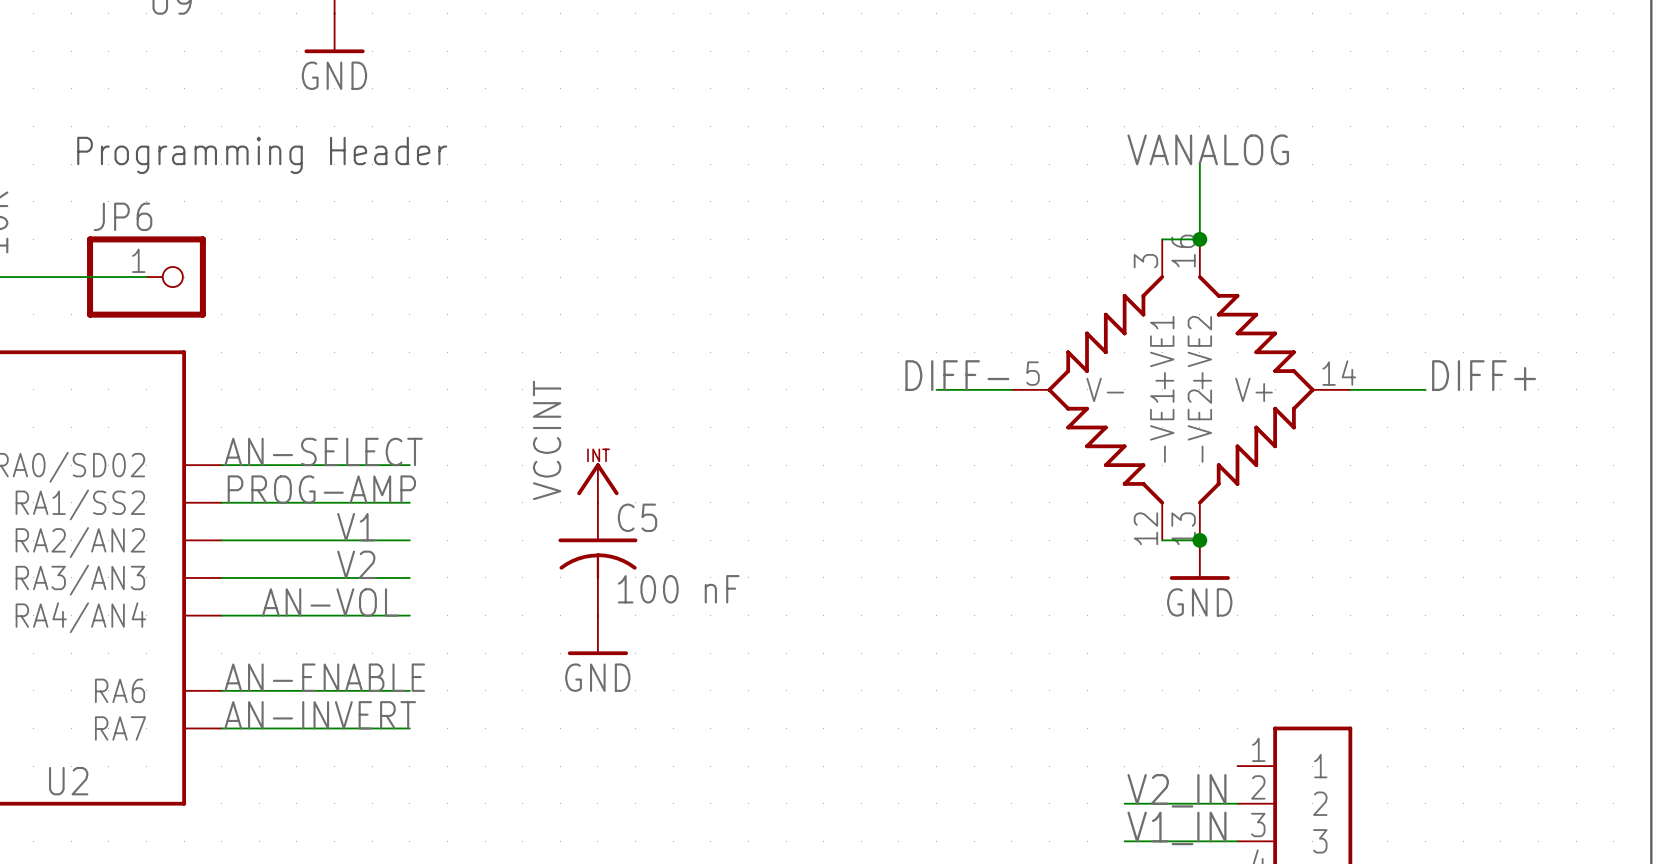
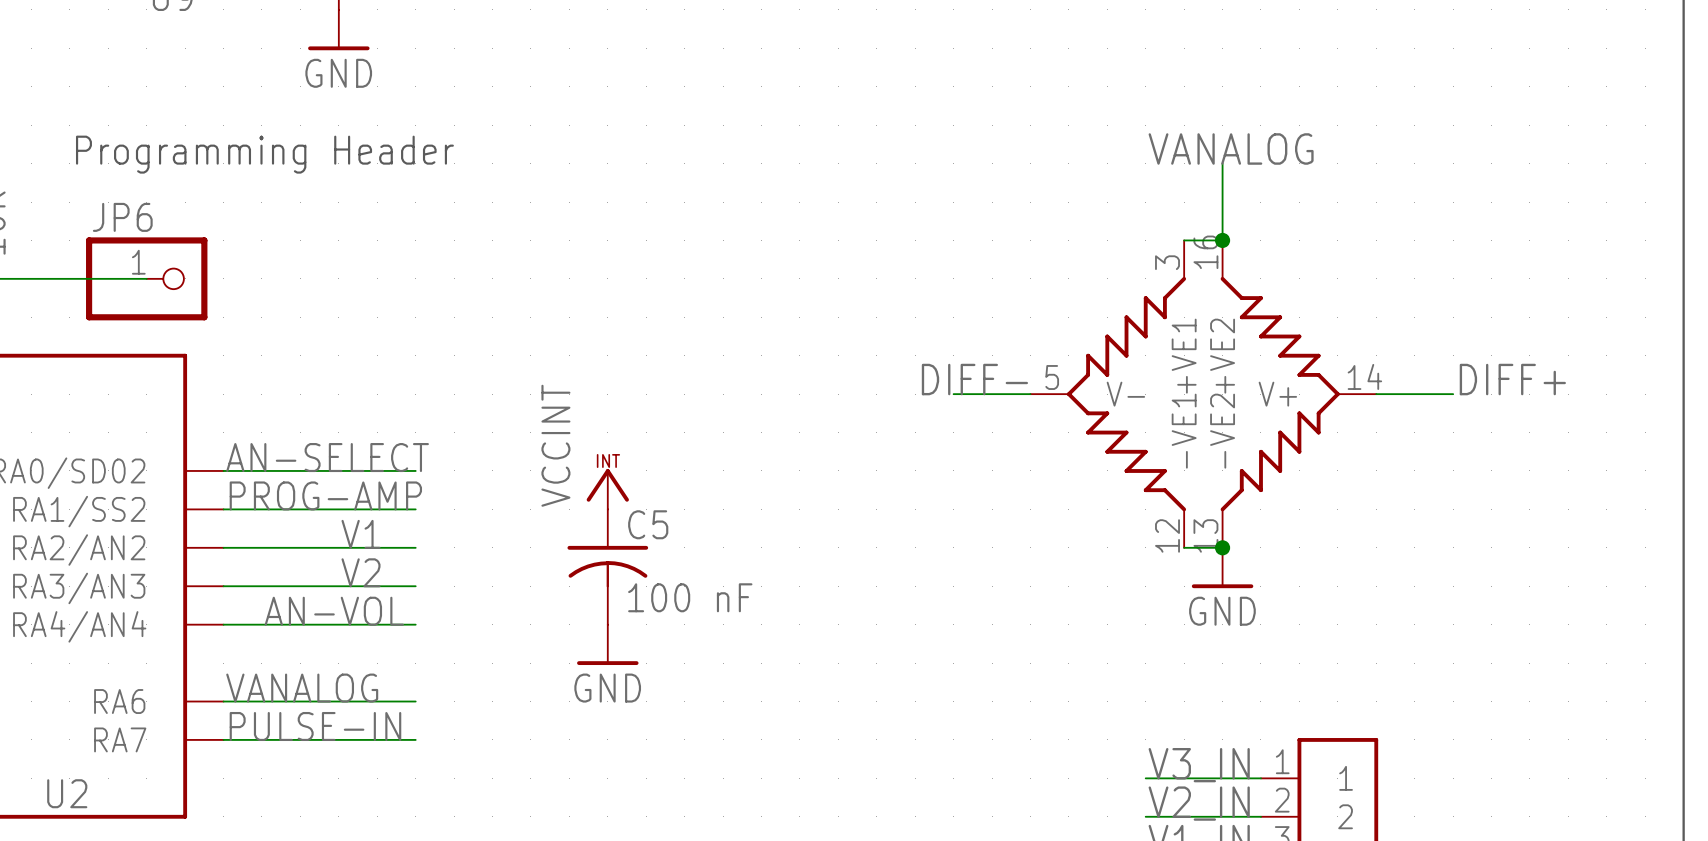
label: AN-ENABLE (324, 677) -> VANALOG (302, 688)
label: AN-INVERT (320, 715) -> PULSE-IN (315, 726)
label: none -> V3_IN (1199, 765)
wire: none -> (1145, 778) (1260, 778)

